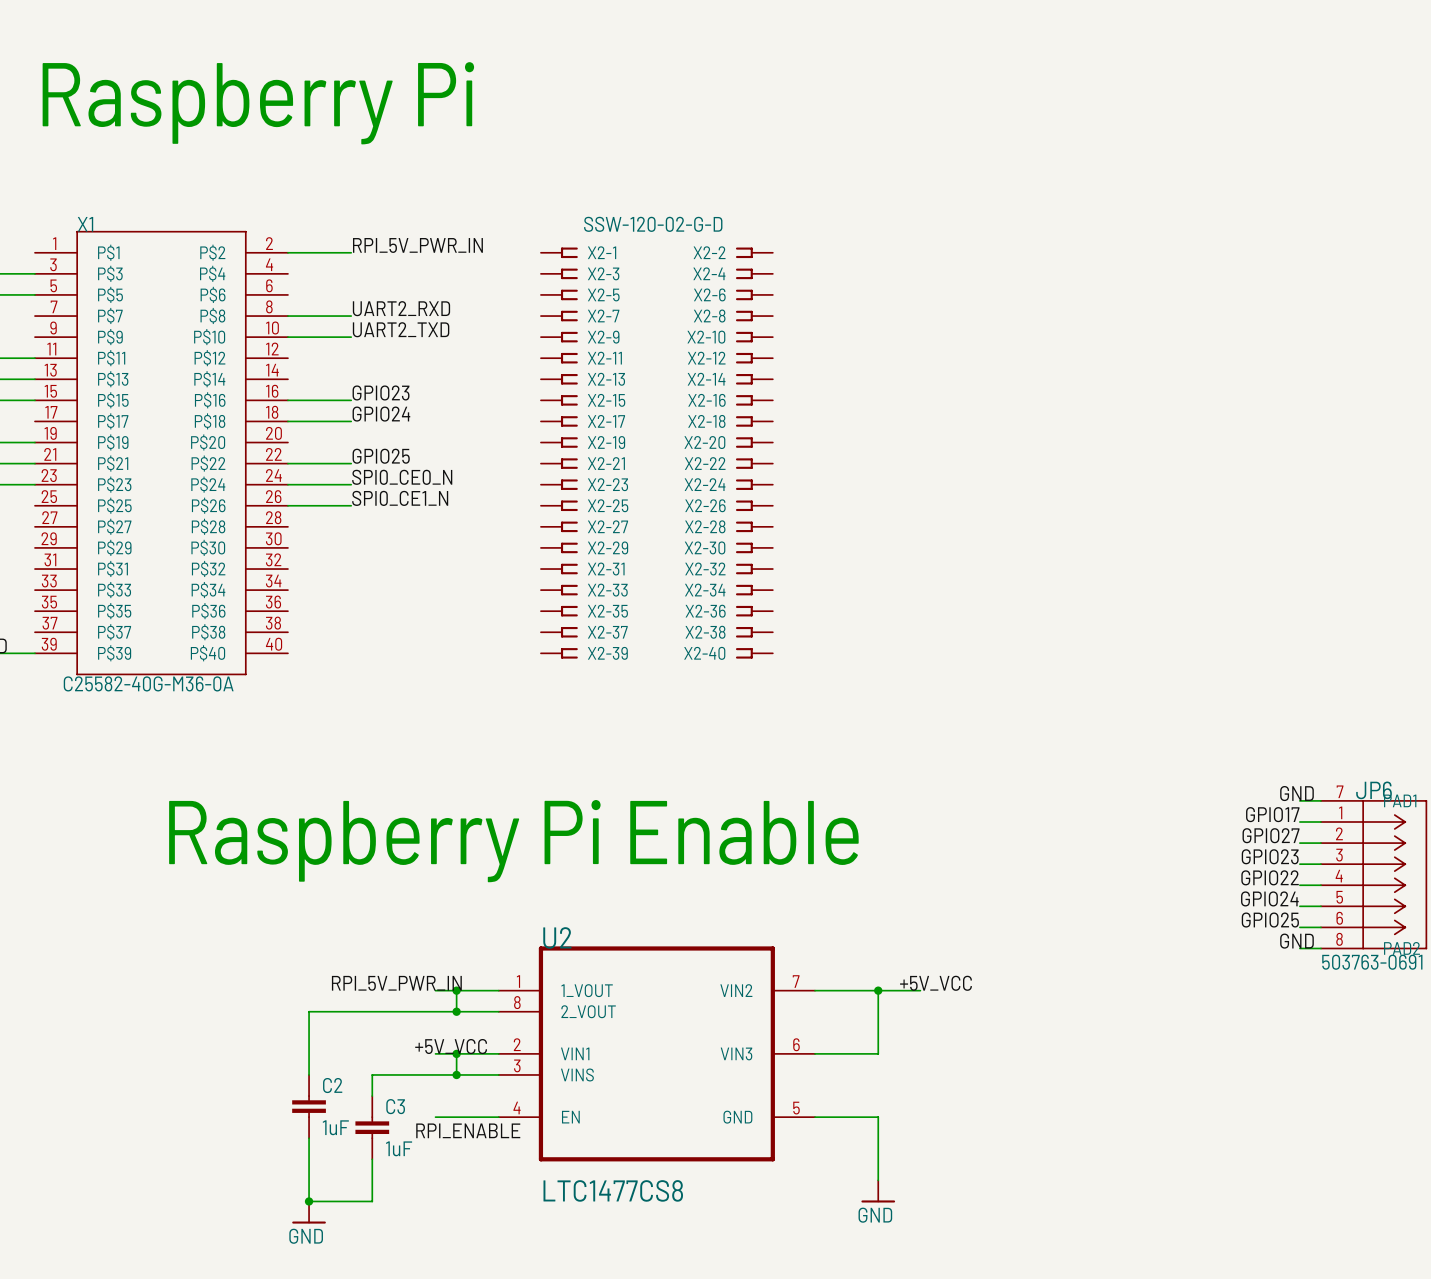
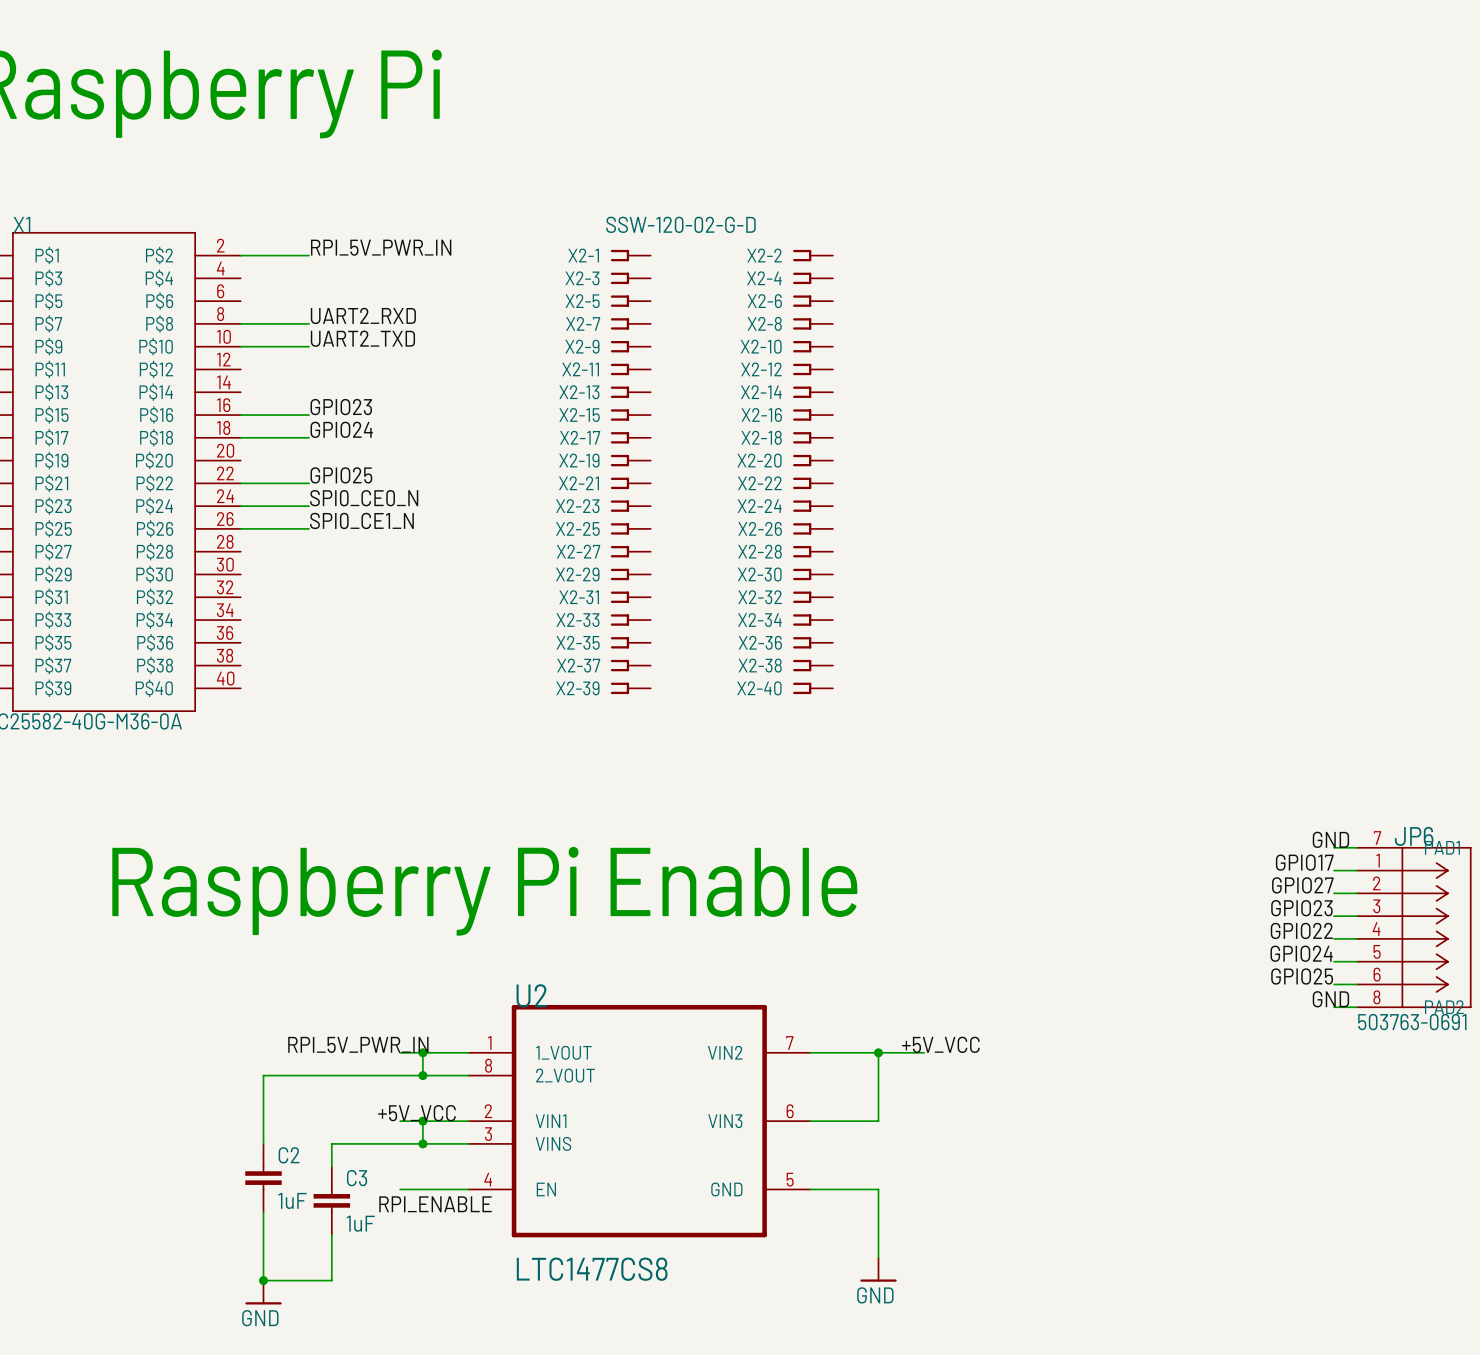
X2-1 value position: SSW-120-02-G-D (653, 224) -> SSW-120-02-G-D (680, 224)
X2-1 position: (559, 252) -> (630, 255)
X2-1 rotation: 0° (569, 252) -> 180° (619, 255)
X2-2 position: (754, 252) -> (813, 255)
X2-3 position: (559, 273) -> (630, 278)
X2-3 rotation: 0° (569, 273) -> 180° (619, 278)
X2-4 position: (754, 273) -> (813, 278)
X2-5 position: (559, 294) -> (630, 301)
X2-5 rotation: 0° (569, 294) -> 180° (619, 301)
X2-6 position: (754, 294) -> (813, 301)
X2-7 position: (559, 316) -> (630, 323)
X2-7 rotation: 0° (569, 316) -> 180° (619, 323)
X2-8 position: (754, 316) -> (813, 323)
X2-9 position: (559, 337) -> (630, 346)
X2-9 rotation: 0° (569, 337) -> 180° (619, 346)
X2-10 position: (754, 337) -> (813, 346)
X2-11 position: (559, 358) -> (630, 369)
X2-11 rotation: 0° (569, 358) -> 180° (619, 369)
X2-12 position: (754, 358) -> (813, 369)
X2-13 position: (559, 379) -> (630, 392)
X2-13 rotation: 0° (569, 379) -> 180° (619, 392)
X2-14 position: (754, 379) -> (813, 392)
X2-15 position: (559, 400) -> (630, 415)
X2-15 rotation: 0° (569, 400) -> 180° (619, 415)
X2-16 position: (754, 400) -> (813, 415)
X2-17 position: (559, 421) -> (630, 437)
X2-17 rotation: 0° (569, 421) -> 180° (619, 437)
X2-18 position: (754, 421) -> (813, 437)
X2-19 position: (559, 442) -> (630, 460)
X2-19 rotation: 0° (569, 442) -> 180° (619, 460)
X2-20 position: (754, 442) -> (813, 460)
X2-21 position: (559, 463) -> (630, 483)
X2-21 rotation: 0° (569, 463) -> 180° (619, 483)
X2-22 position: (754, 463) -> (813, 483)
X2-23 position: (559, 484) -> (630, 506)
X2-23 rotation: 0° (569, 484) -> 180° (619, 506)
X2-24 position: (754, 484) -> (813, 506)
X2-25 position: (559, 505) -> (630, 528)
X2-25 rotation: 0° (569, 505) -> 180° (619, 528)
X2-26 position: (754, 505) -> (813, 528)
X2-27 position: (559, 526) -> (630, 551)
X2-27 rotation: 0° (569, 526) -> 180° (619, 551)
X2-28 position: (754, 526) -> (813, 551)
X2-29 position: (559, 547) -> (630, 574)
X2-29 rotation: 0° (569, 547) -> 180° (619, 574)
X2-30 position: (754, 547) -> (813, 574)
X2-31 position: (559, 569) -> (630, 597)
X2-31 rotation: 0° (569, 569) -> 180° (619, 597)
X2-32 position: (754, 569) -> (813, 597)
X2-33 position: (559, 590) -> (630, 620)
X2-33 rotation: 0° (569, 590) -> 180° (619, 620)
X2-34 position: (754, 590) -> (813, 620)
X2-35 position: (559, 611) -> (630, 642)
X2-35 rotation: 0° (569, 611) -> 180° (619, 642)
X2-36 position: (754, 611) -> (813, 642)
X2-37 position: (559, 632) -> (630, 665)
X2-37 rotation: 0° (569, 632) -> 180° (619, 665)
X2-38 position: (754, 632) -> (813, 665)
X2-39 position: (559, 653) -> (630, 688)
X2-39 rotation: 0° (569, 653) -> 180° (619, 688)
X2-40 position: (754, 653) -> (813, 688)

